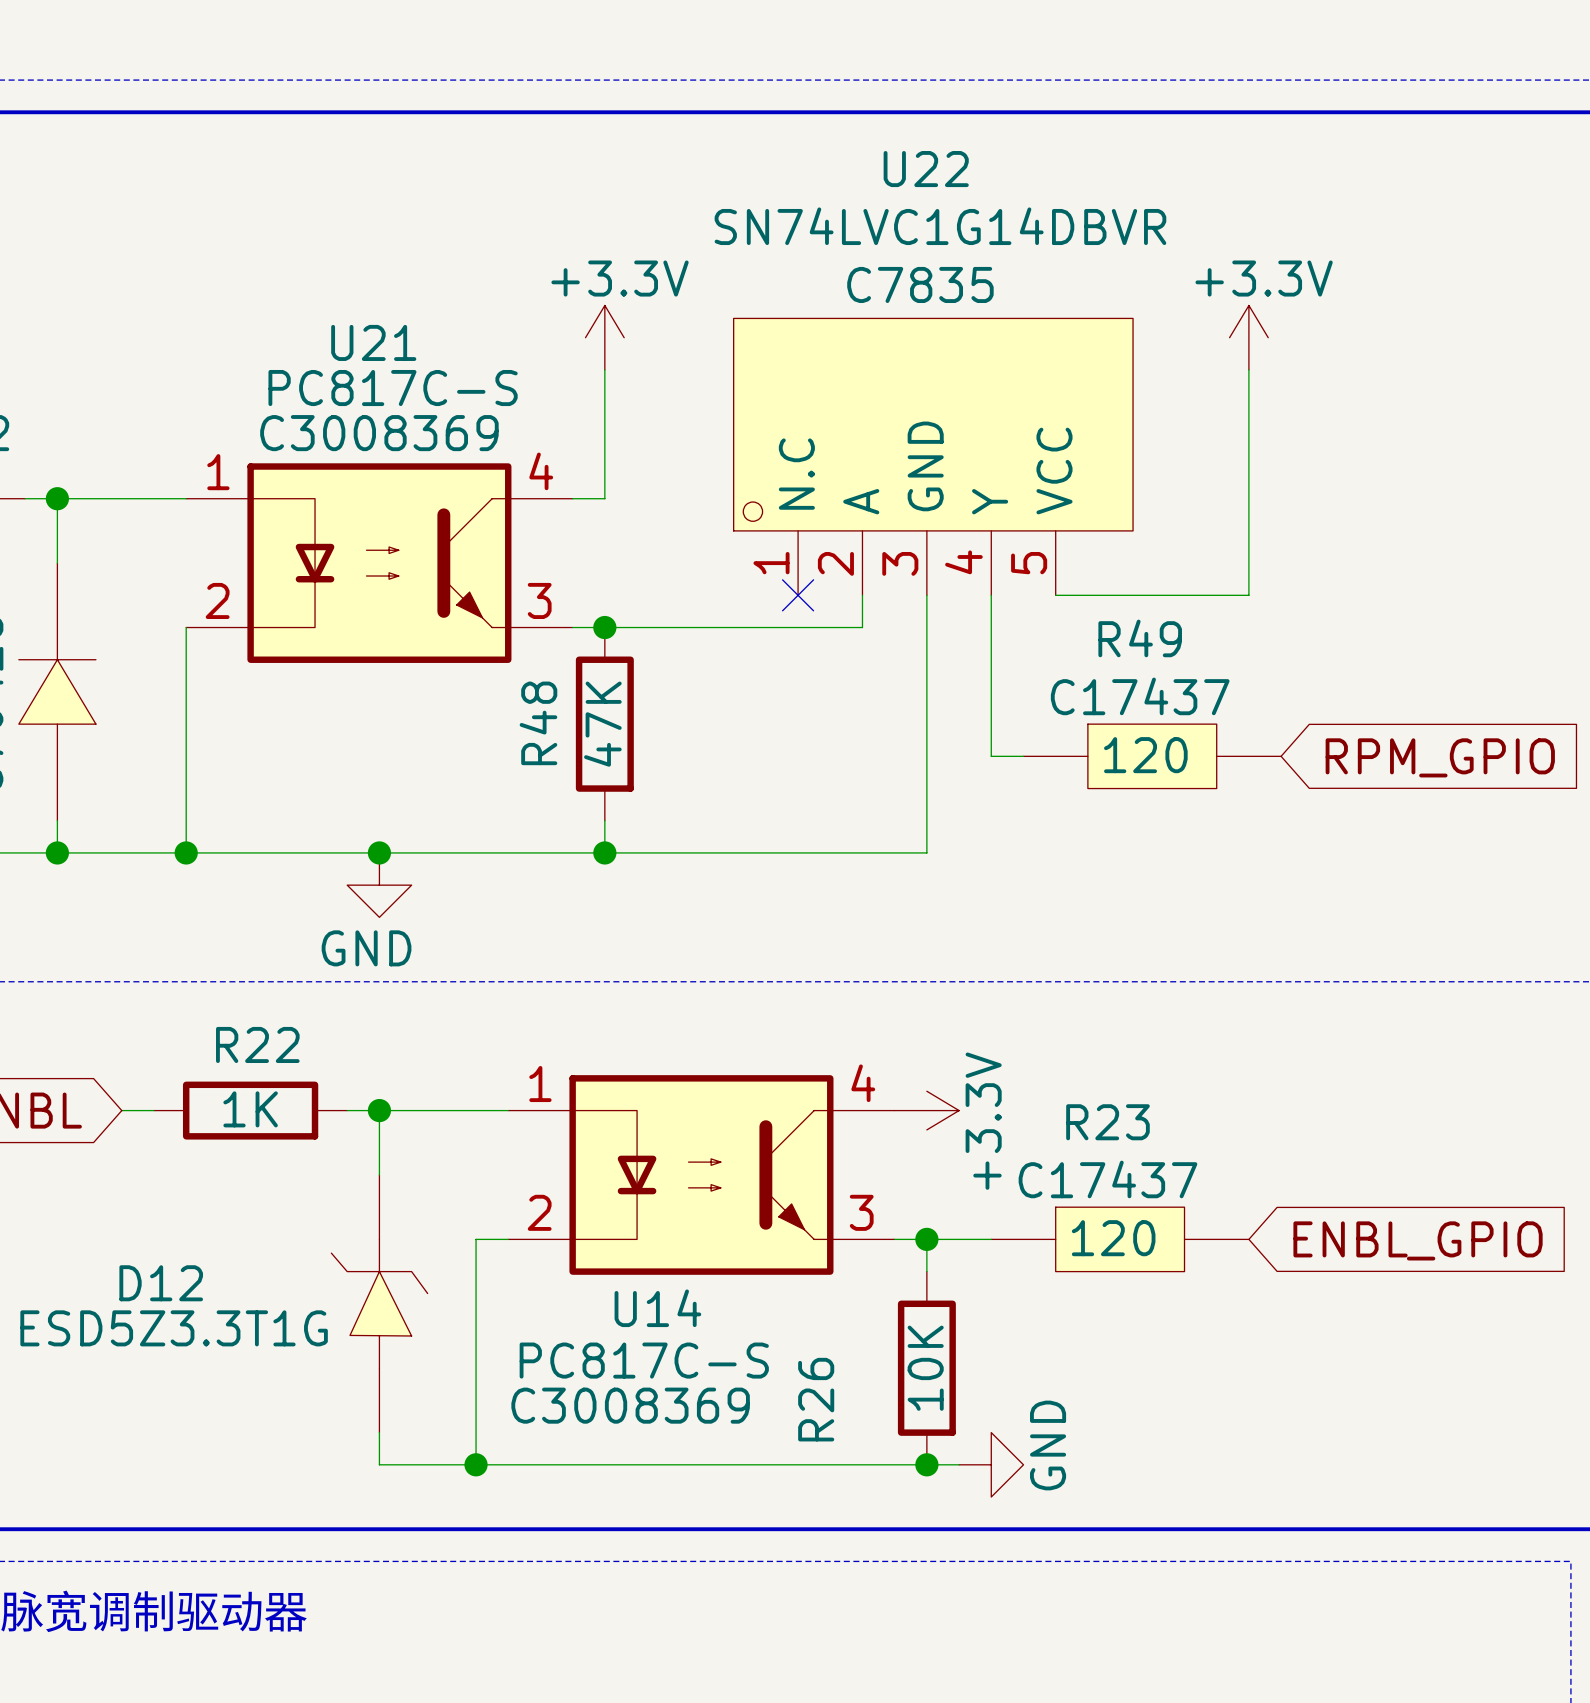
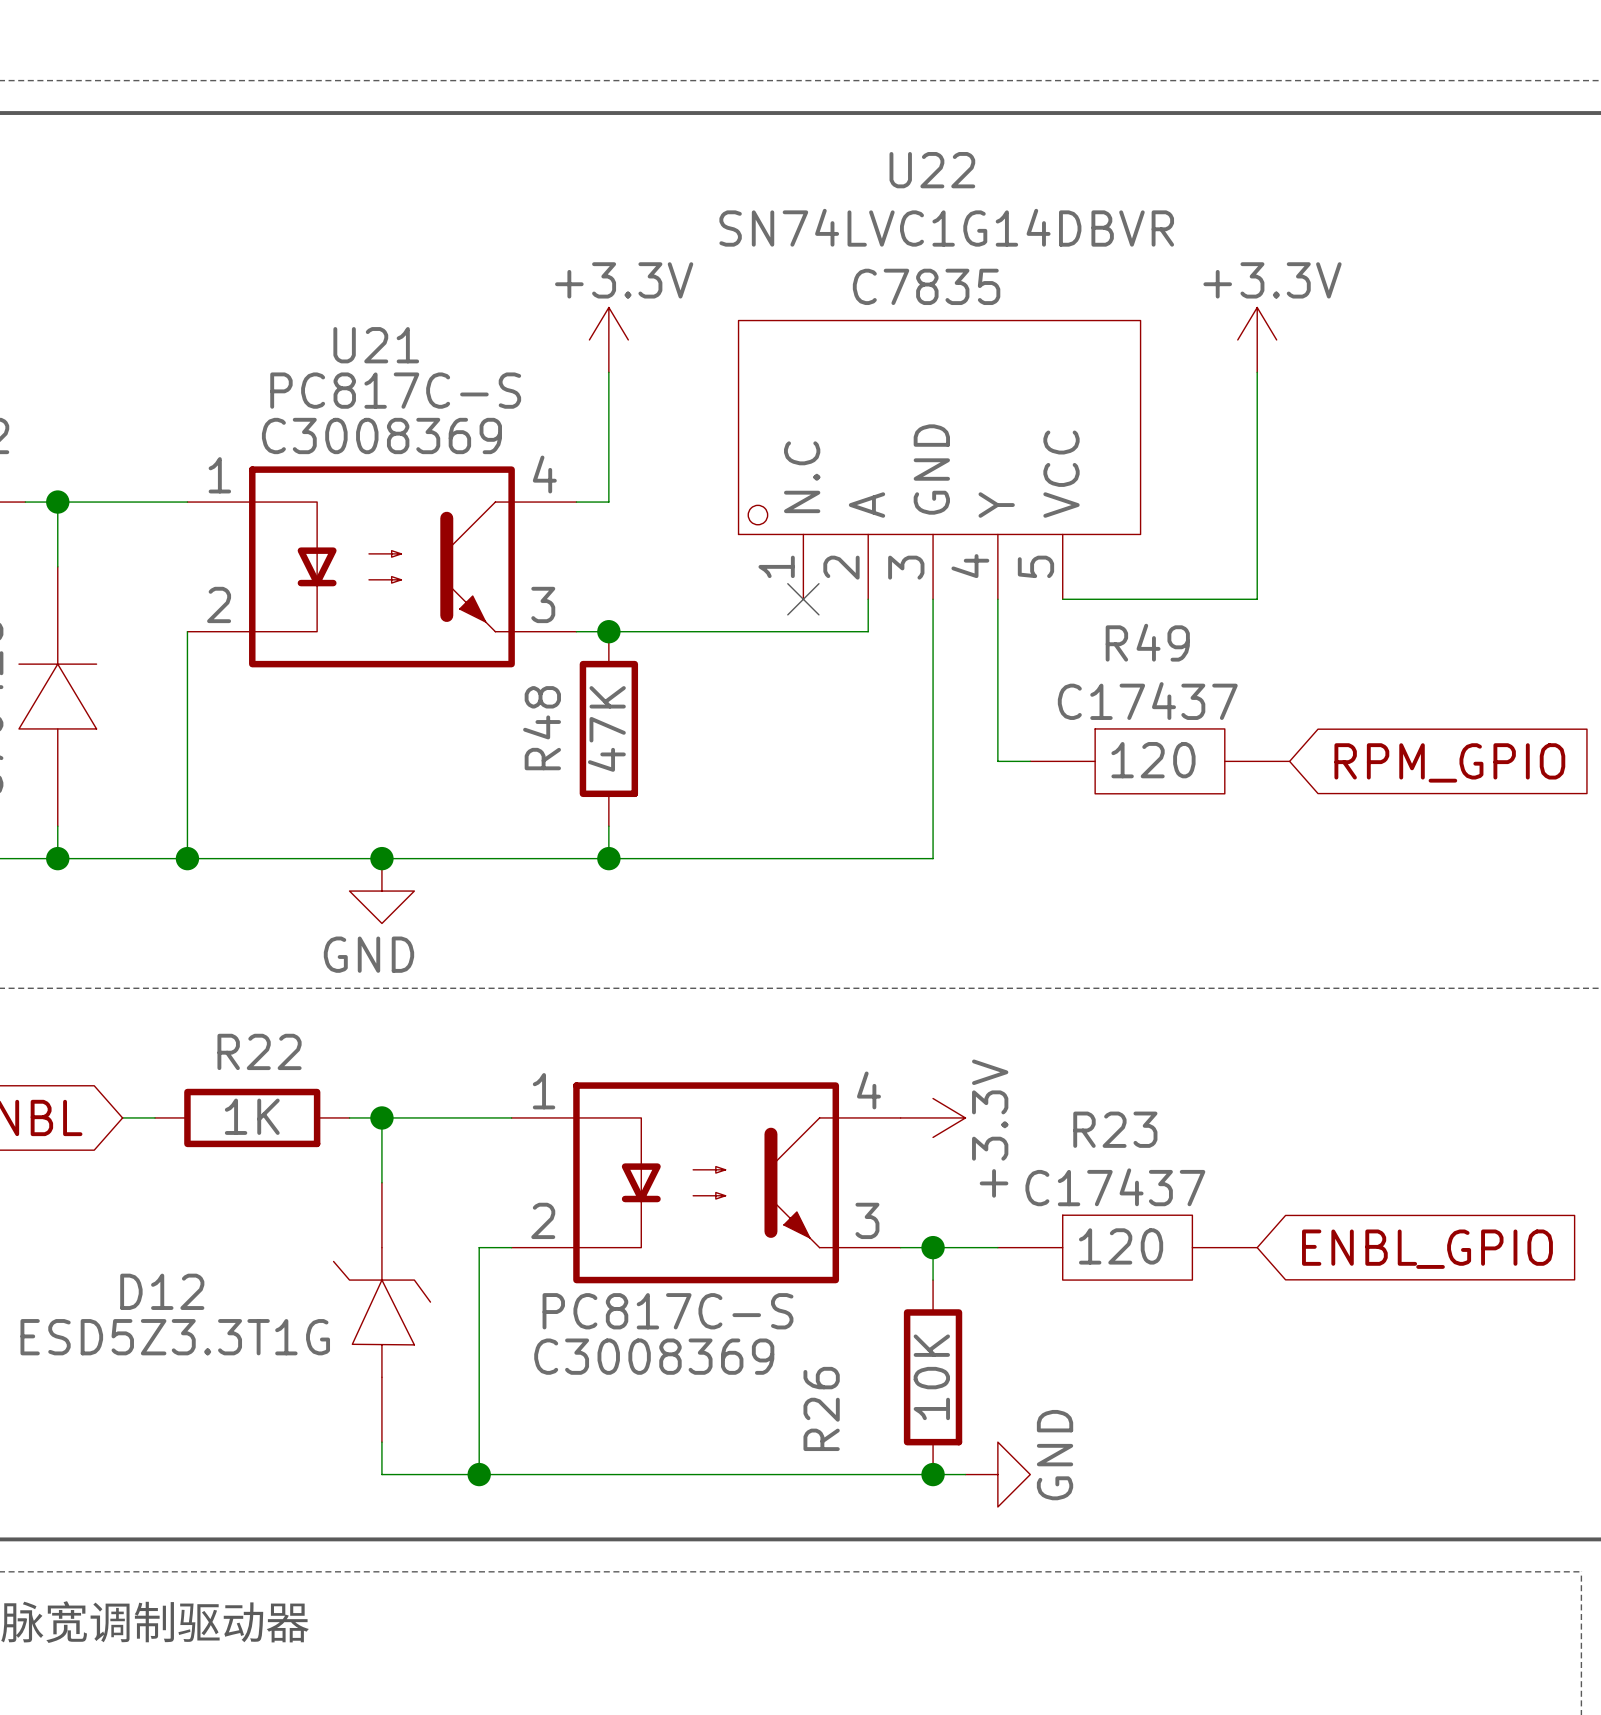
U14 name: U14 (657, 1308) -> none
U14 value position: PC817C-S (644, 1360) -> PC817C-S (667, 1311)
U14 text position: C3008369 (630, 1405) -> C3008369 (654, 1356)

